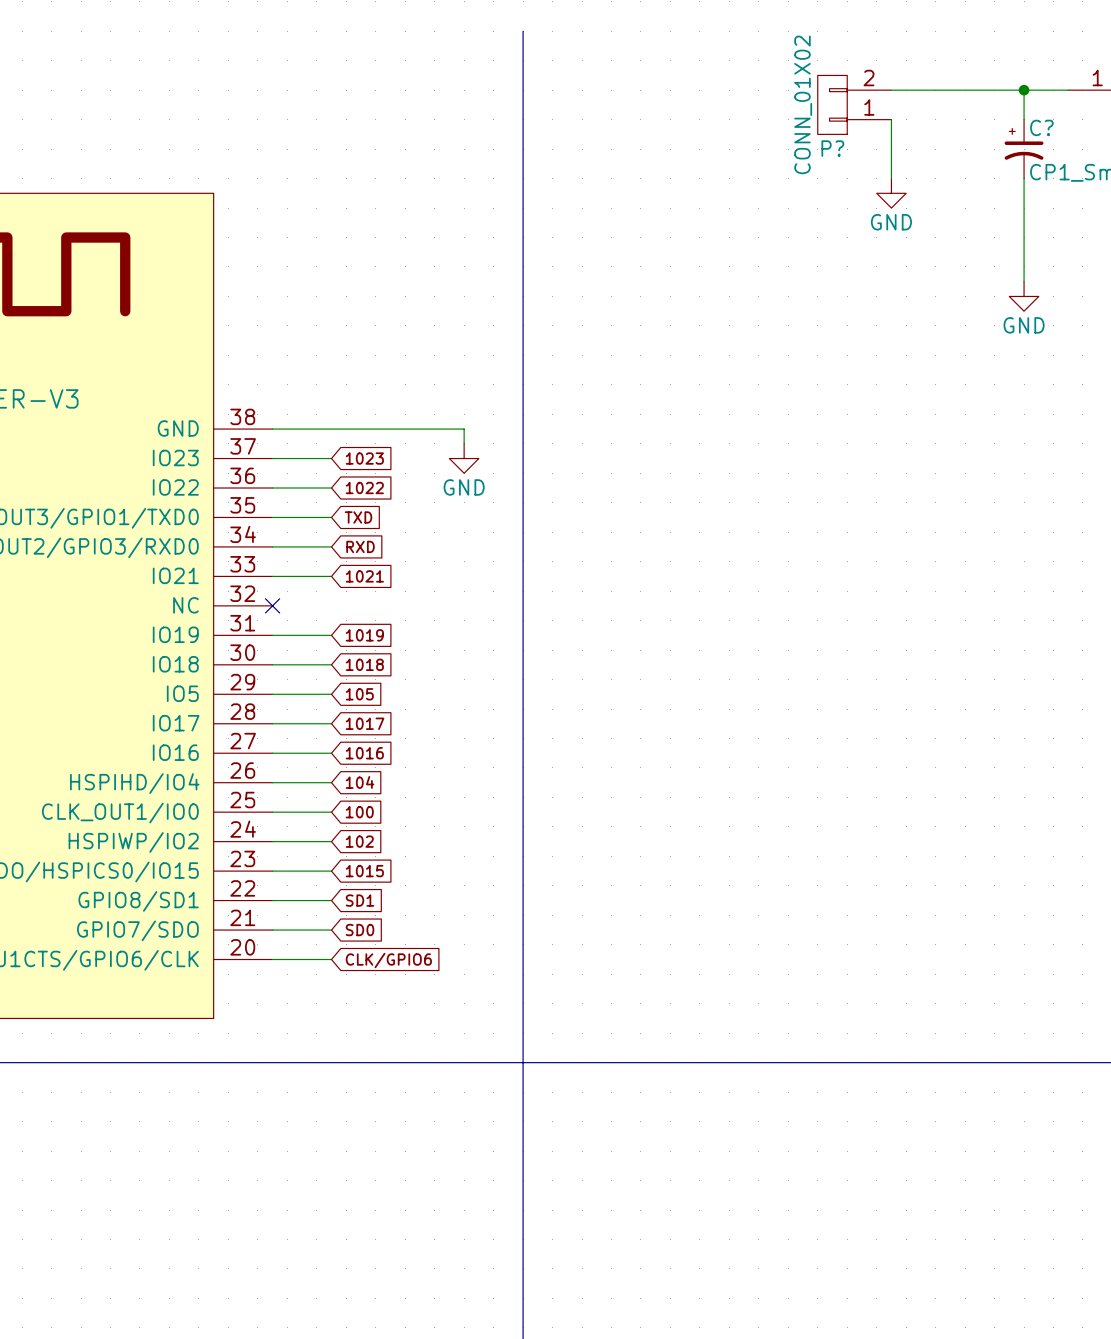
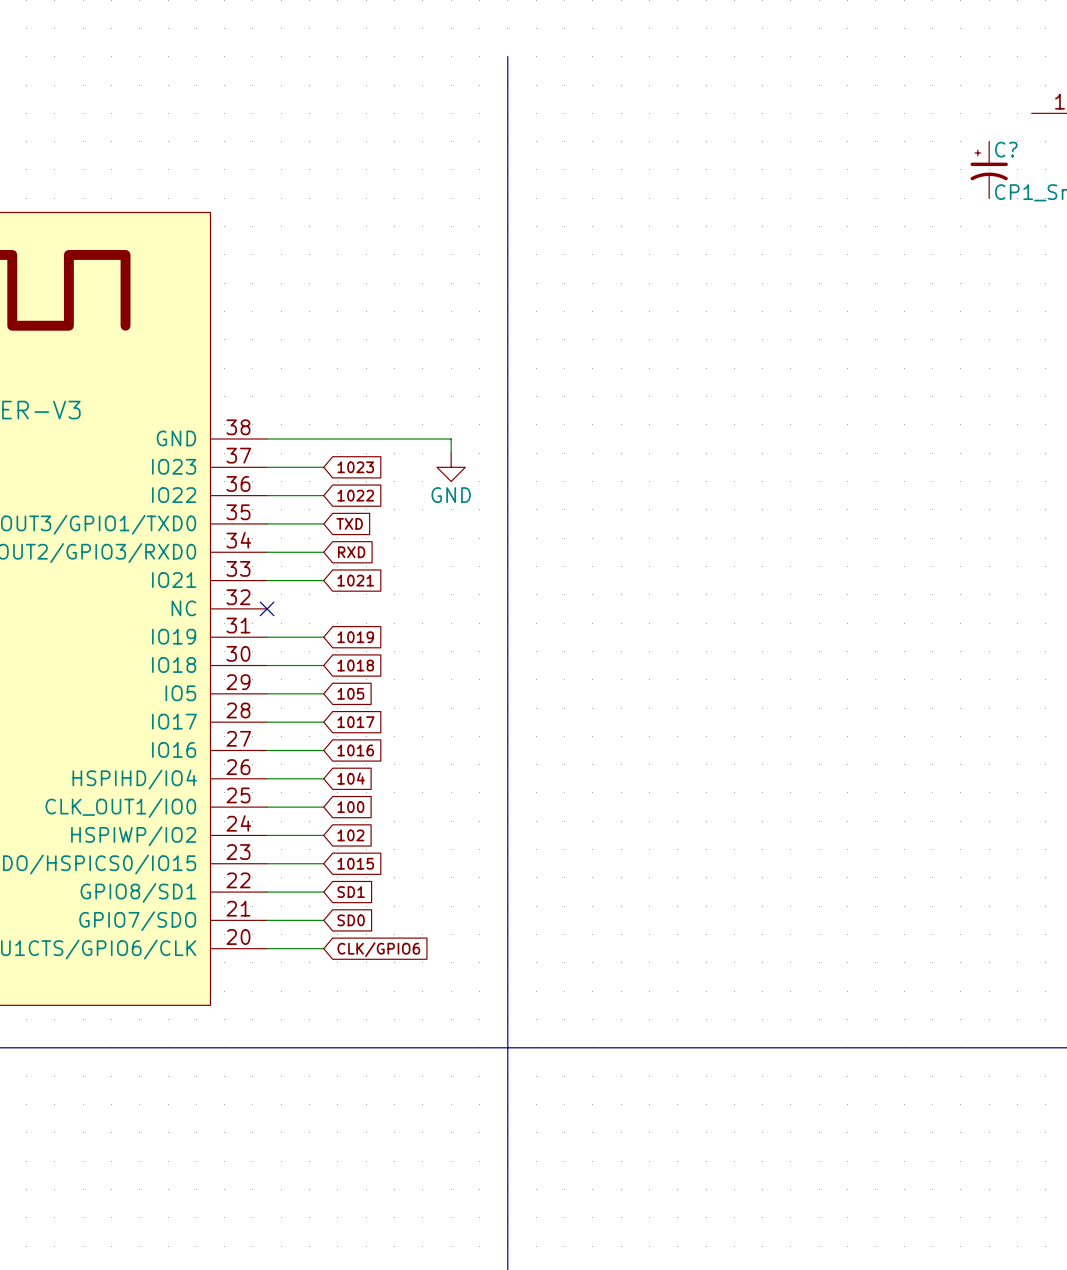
wire: (891, 90) (1068, 90) -> none
wire: (1024, 90) (1024, 119) -> none
junction: (1024, 90) -> none
P?: CONN_01X02 (854, 104) -> none
wire: (891, 119) (891, 178) -> none
wire: (1024, 178) (1024, 281) -> none
power symbol: GND (891, 193) -> none
power symbol: GND (1024, 296) -> none

